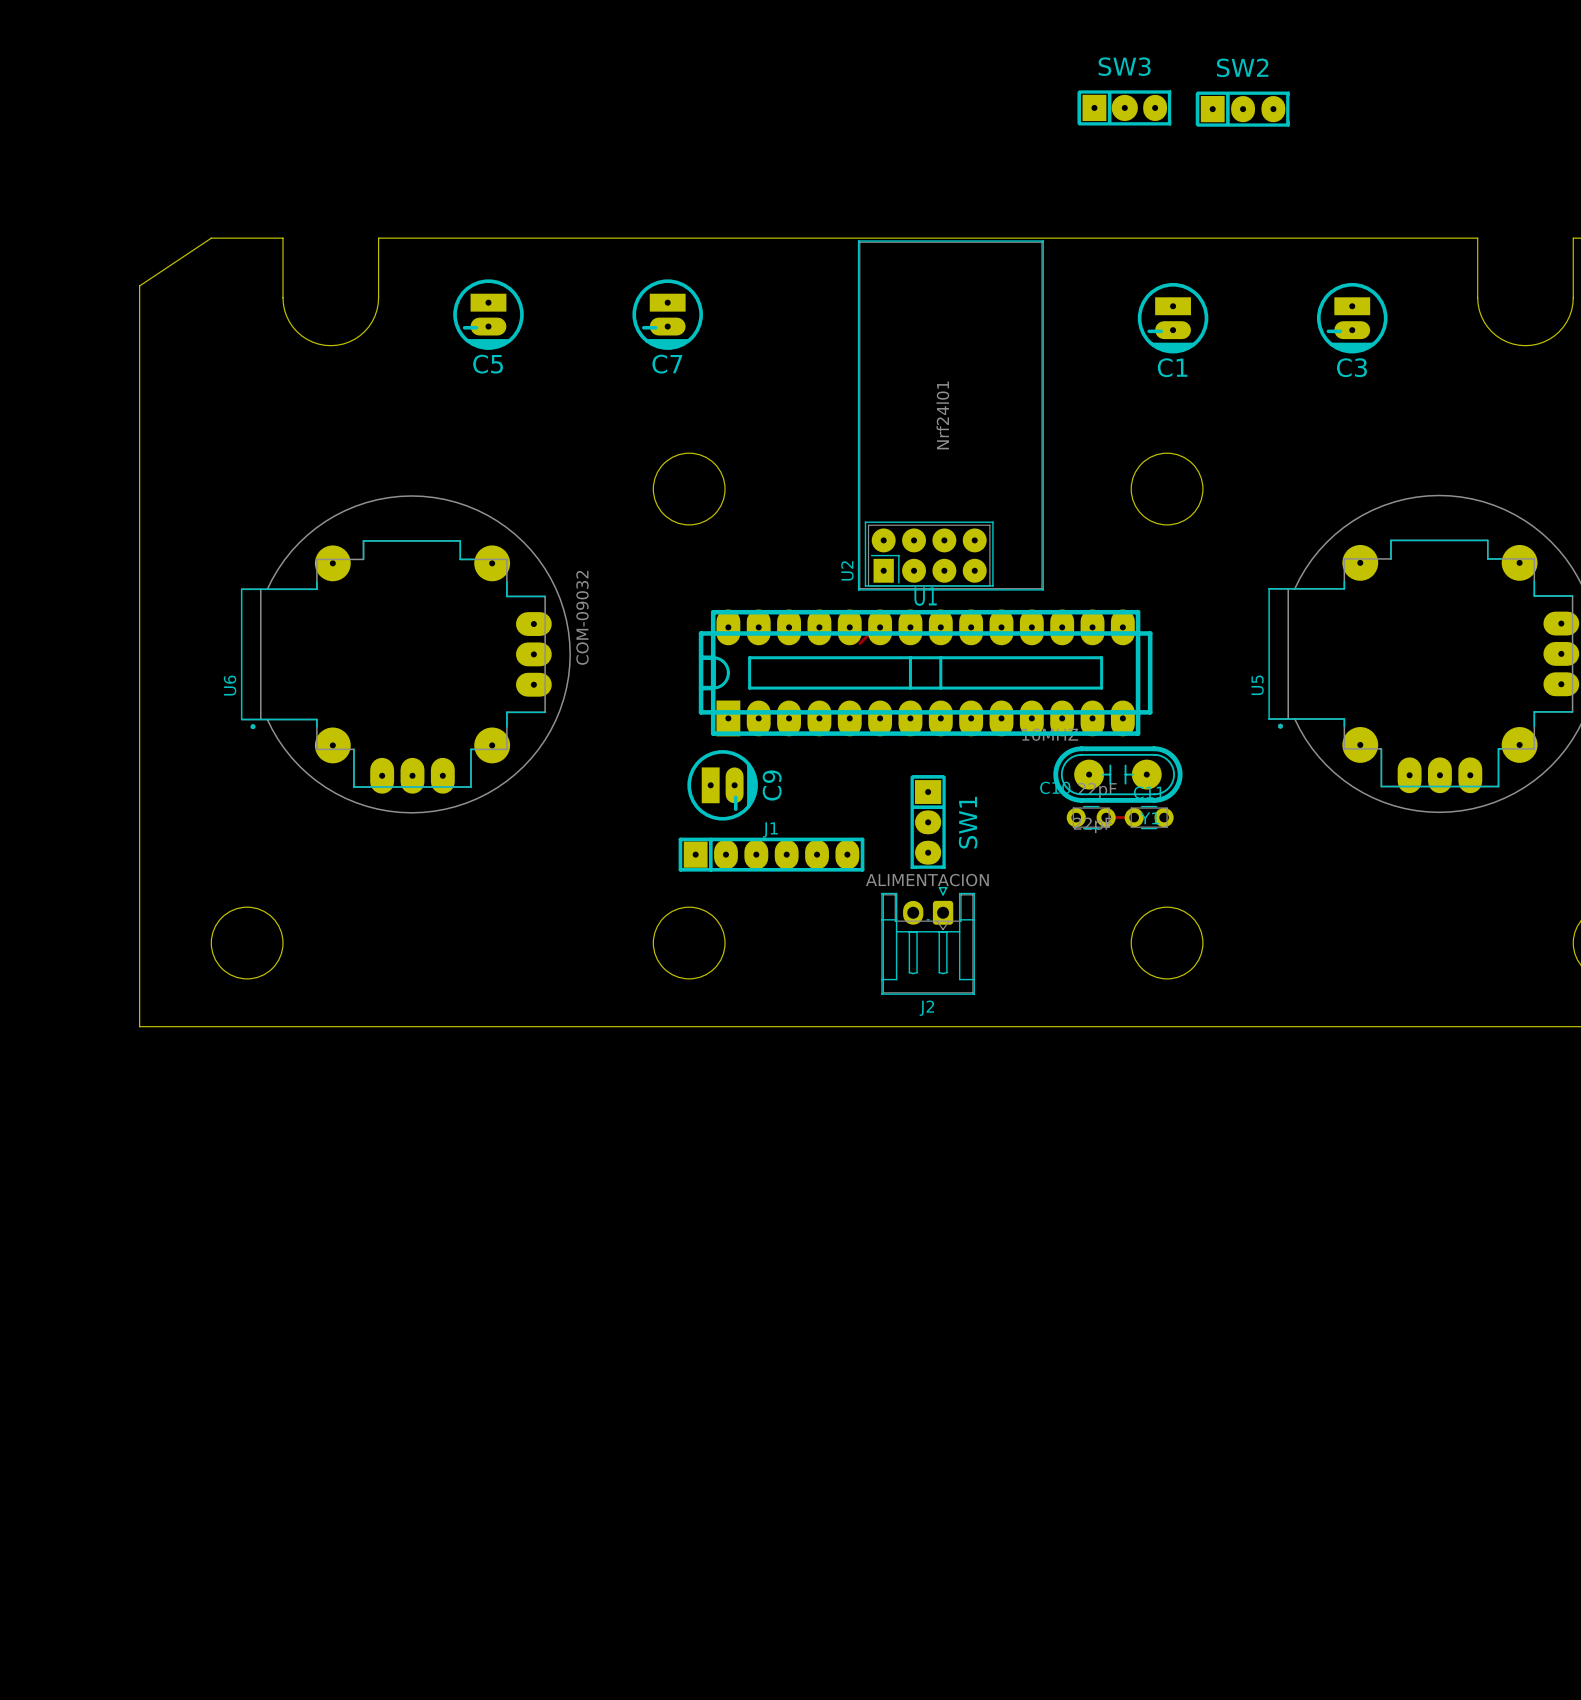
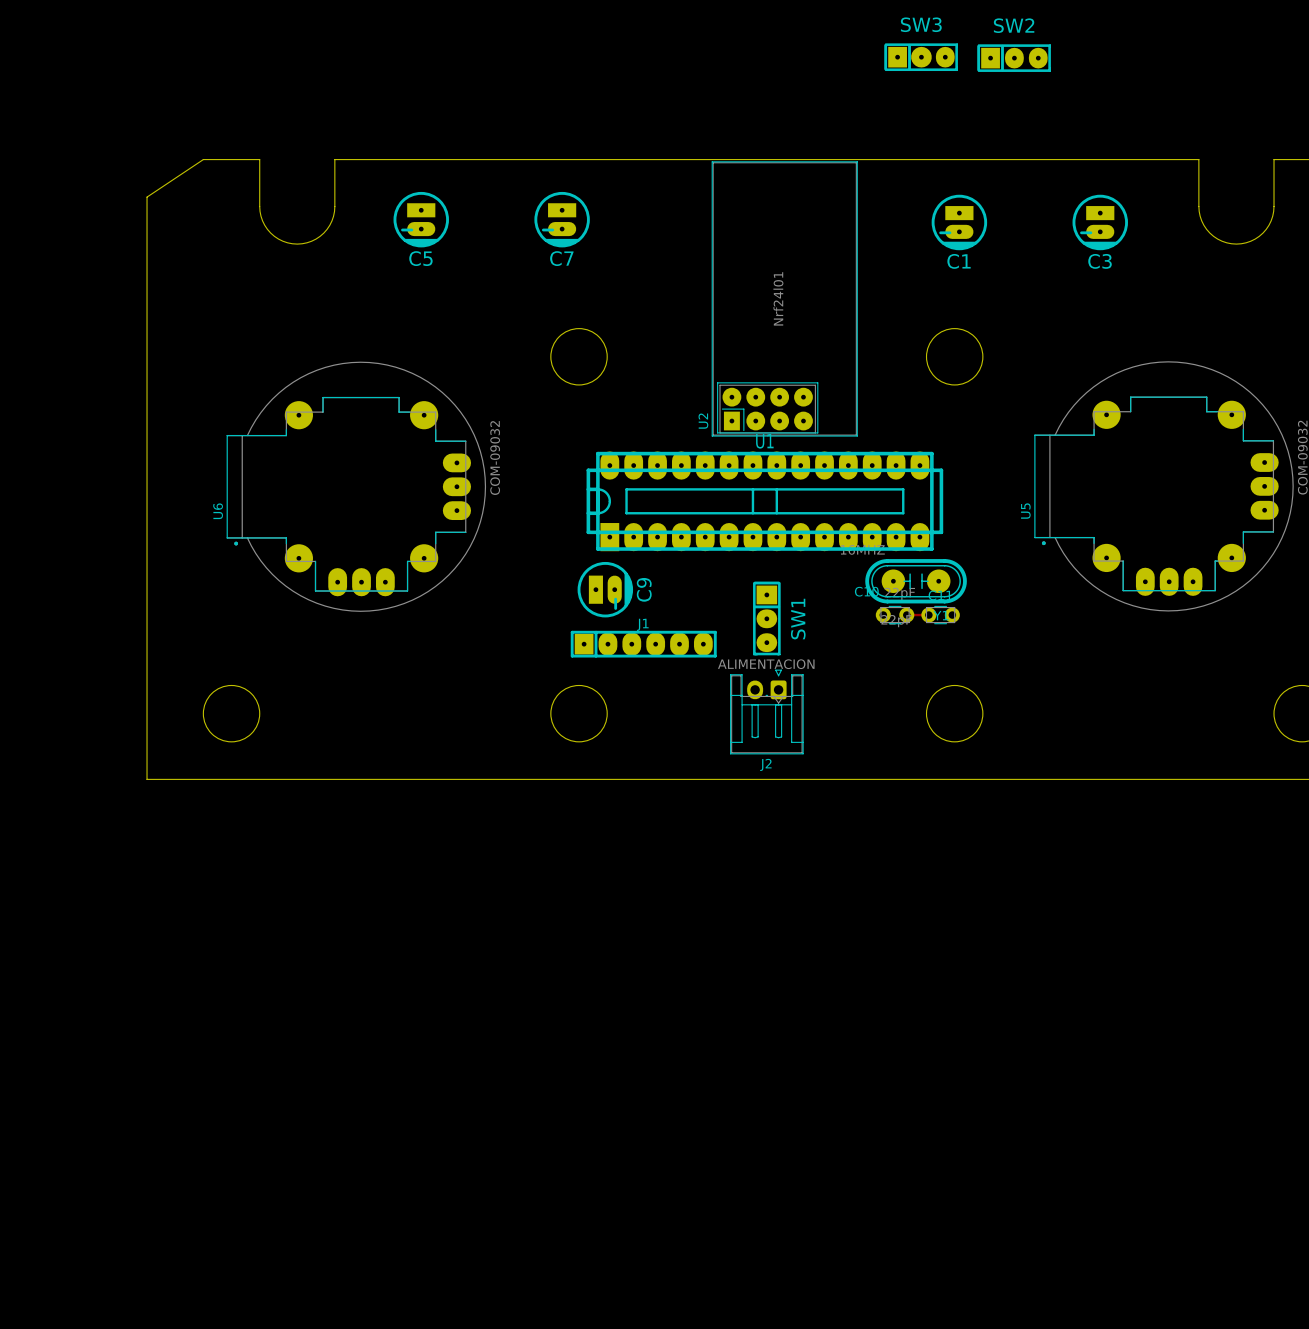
track: (869, 633) (859, 643) -> none

